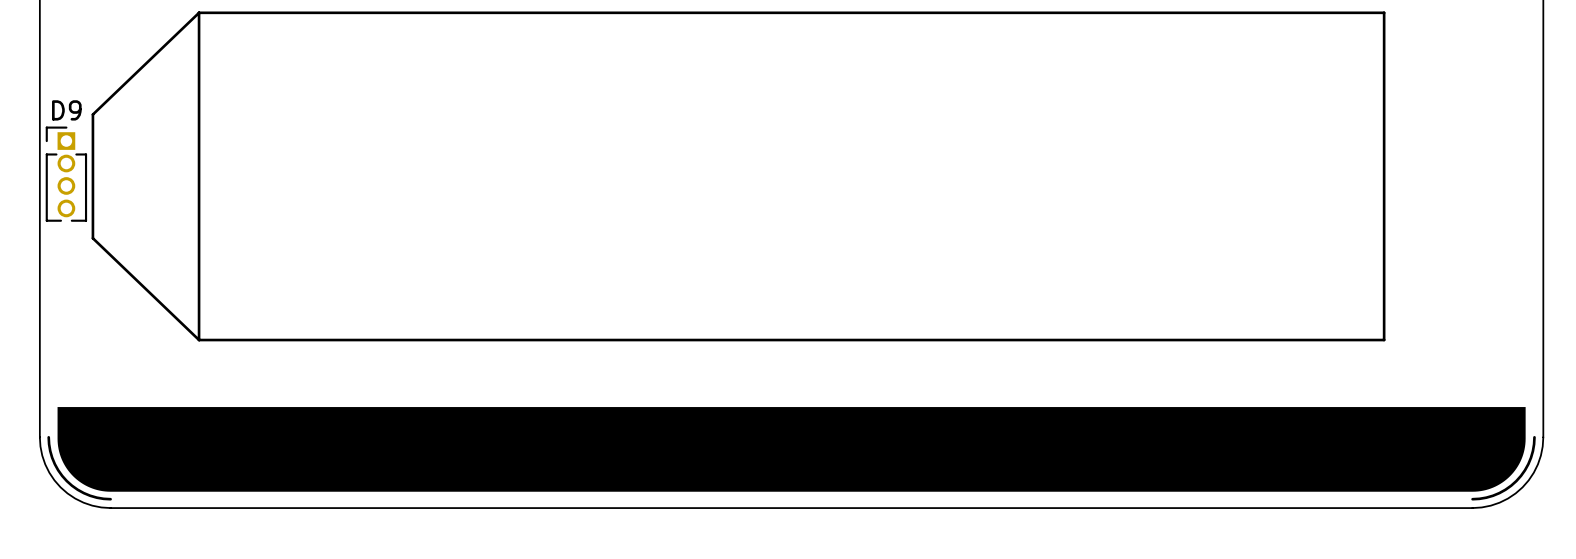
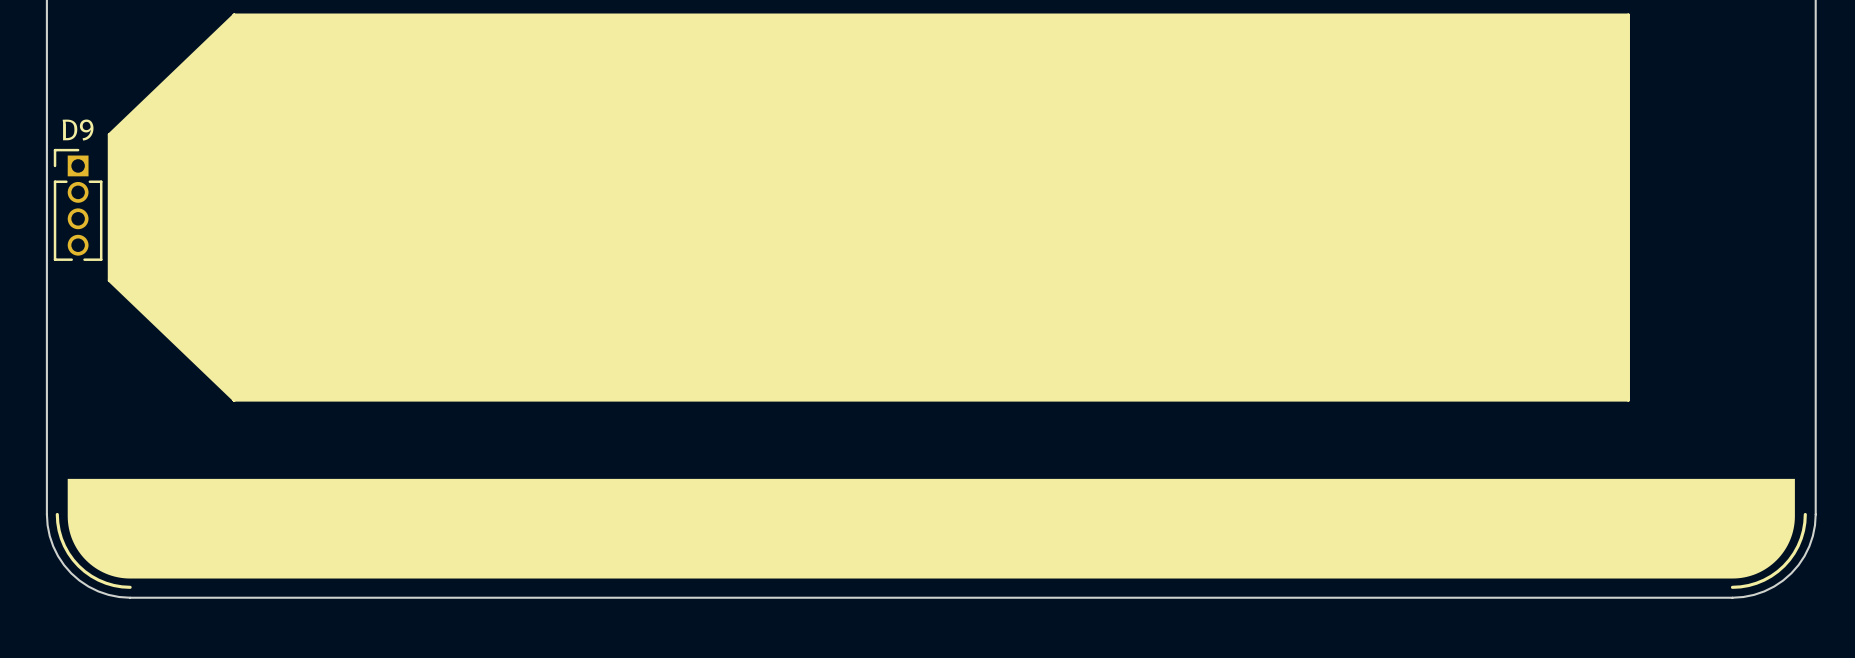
drawing: none -> [109, 15, 1629, 401]

